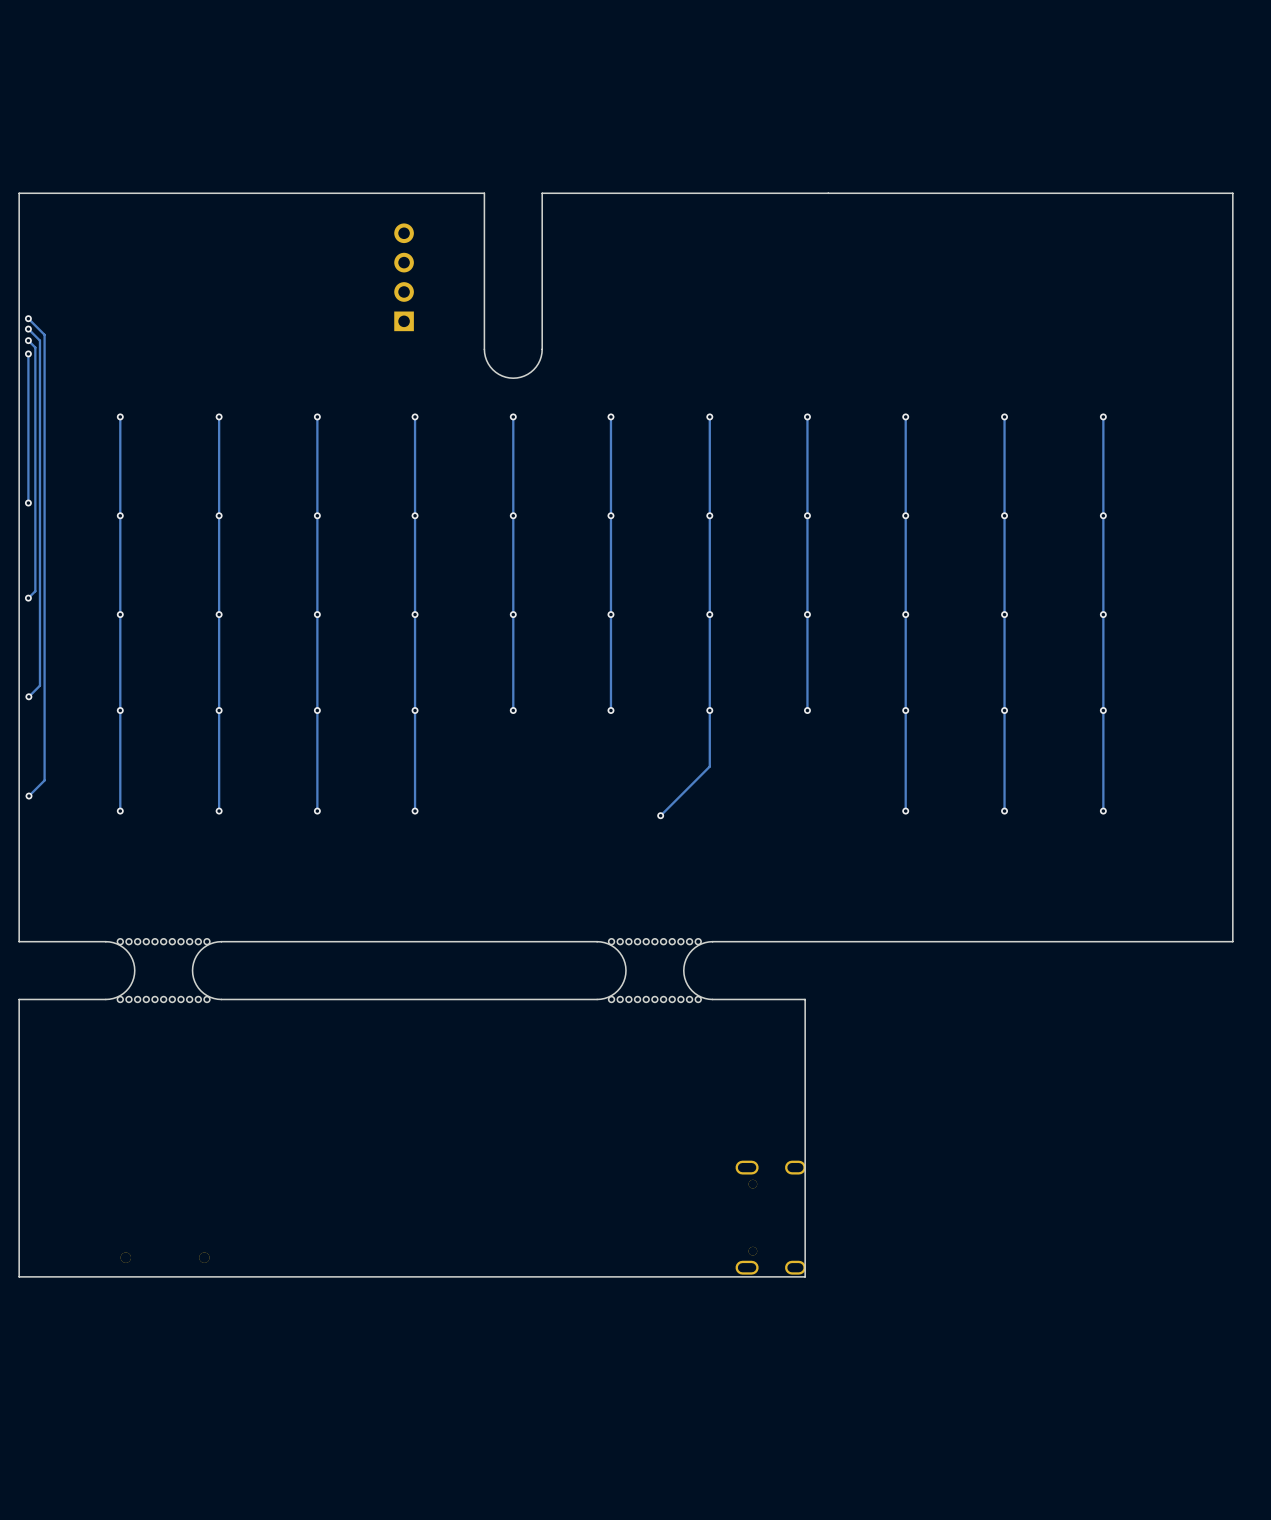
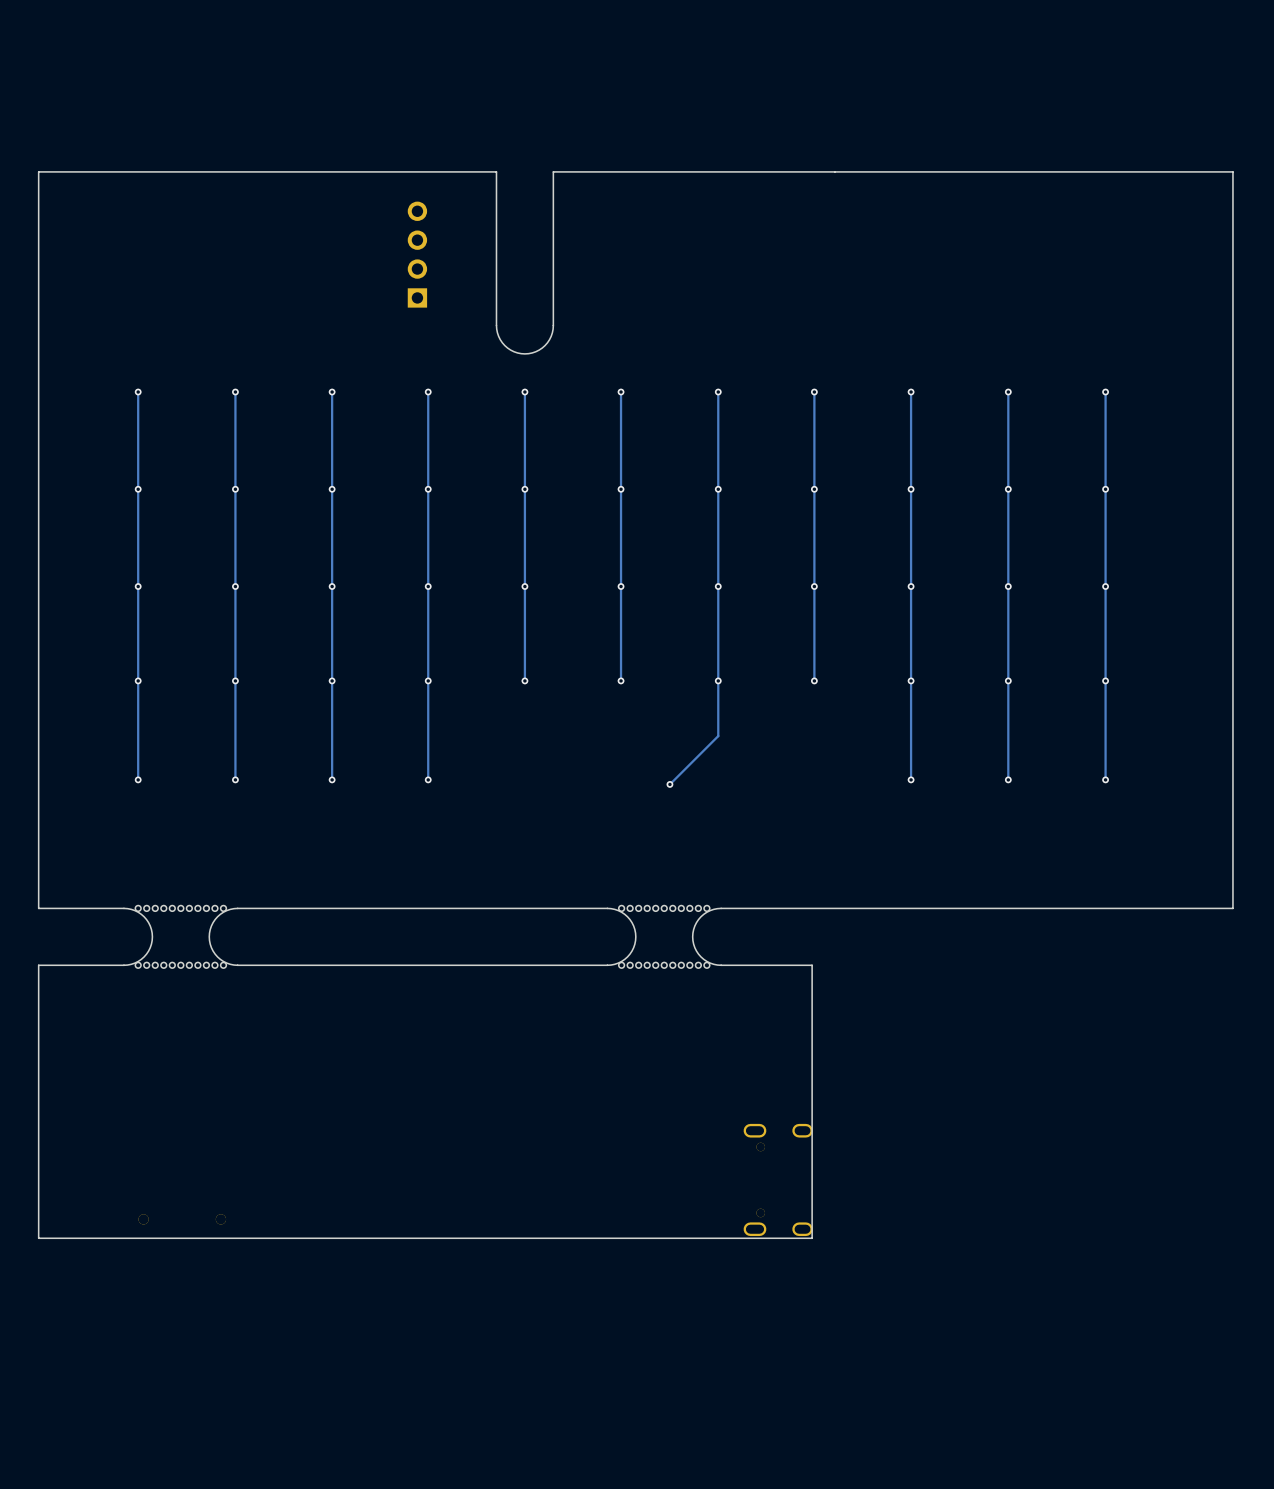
track: (28, 318) (44, 334) (44, 780) (28, 796) -> none
via: (28, 318) -> none
track: (28, 329) (39, 340) (39, 685) (28, 696) -> none
via: (28, 329) -> none
track: (28, 340) (35, 347) (35, 591) (28, 598) -> none
via: (28, 340) -> none
track: (28, 353) (28, 503) -> none
via: (28, 353) -> none
via: (28, 503) -> none
via: (28, 598) -> none
via: (28, 696) -> none
via: (28, 796) -> none

